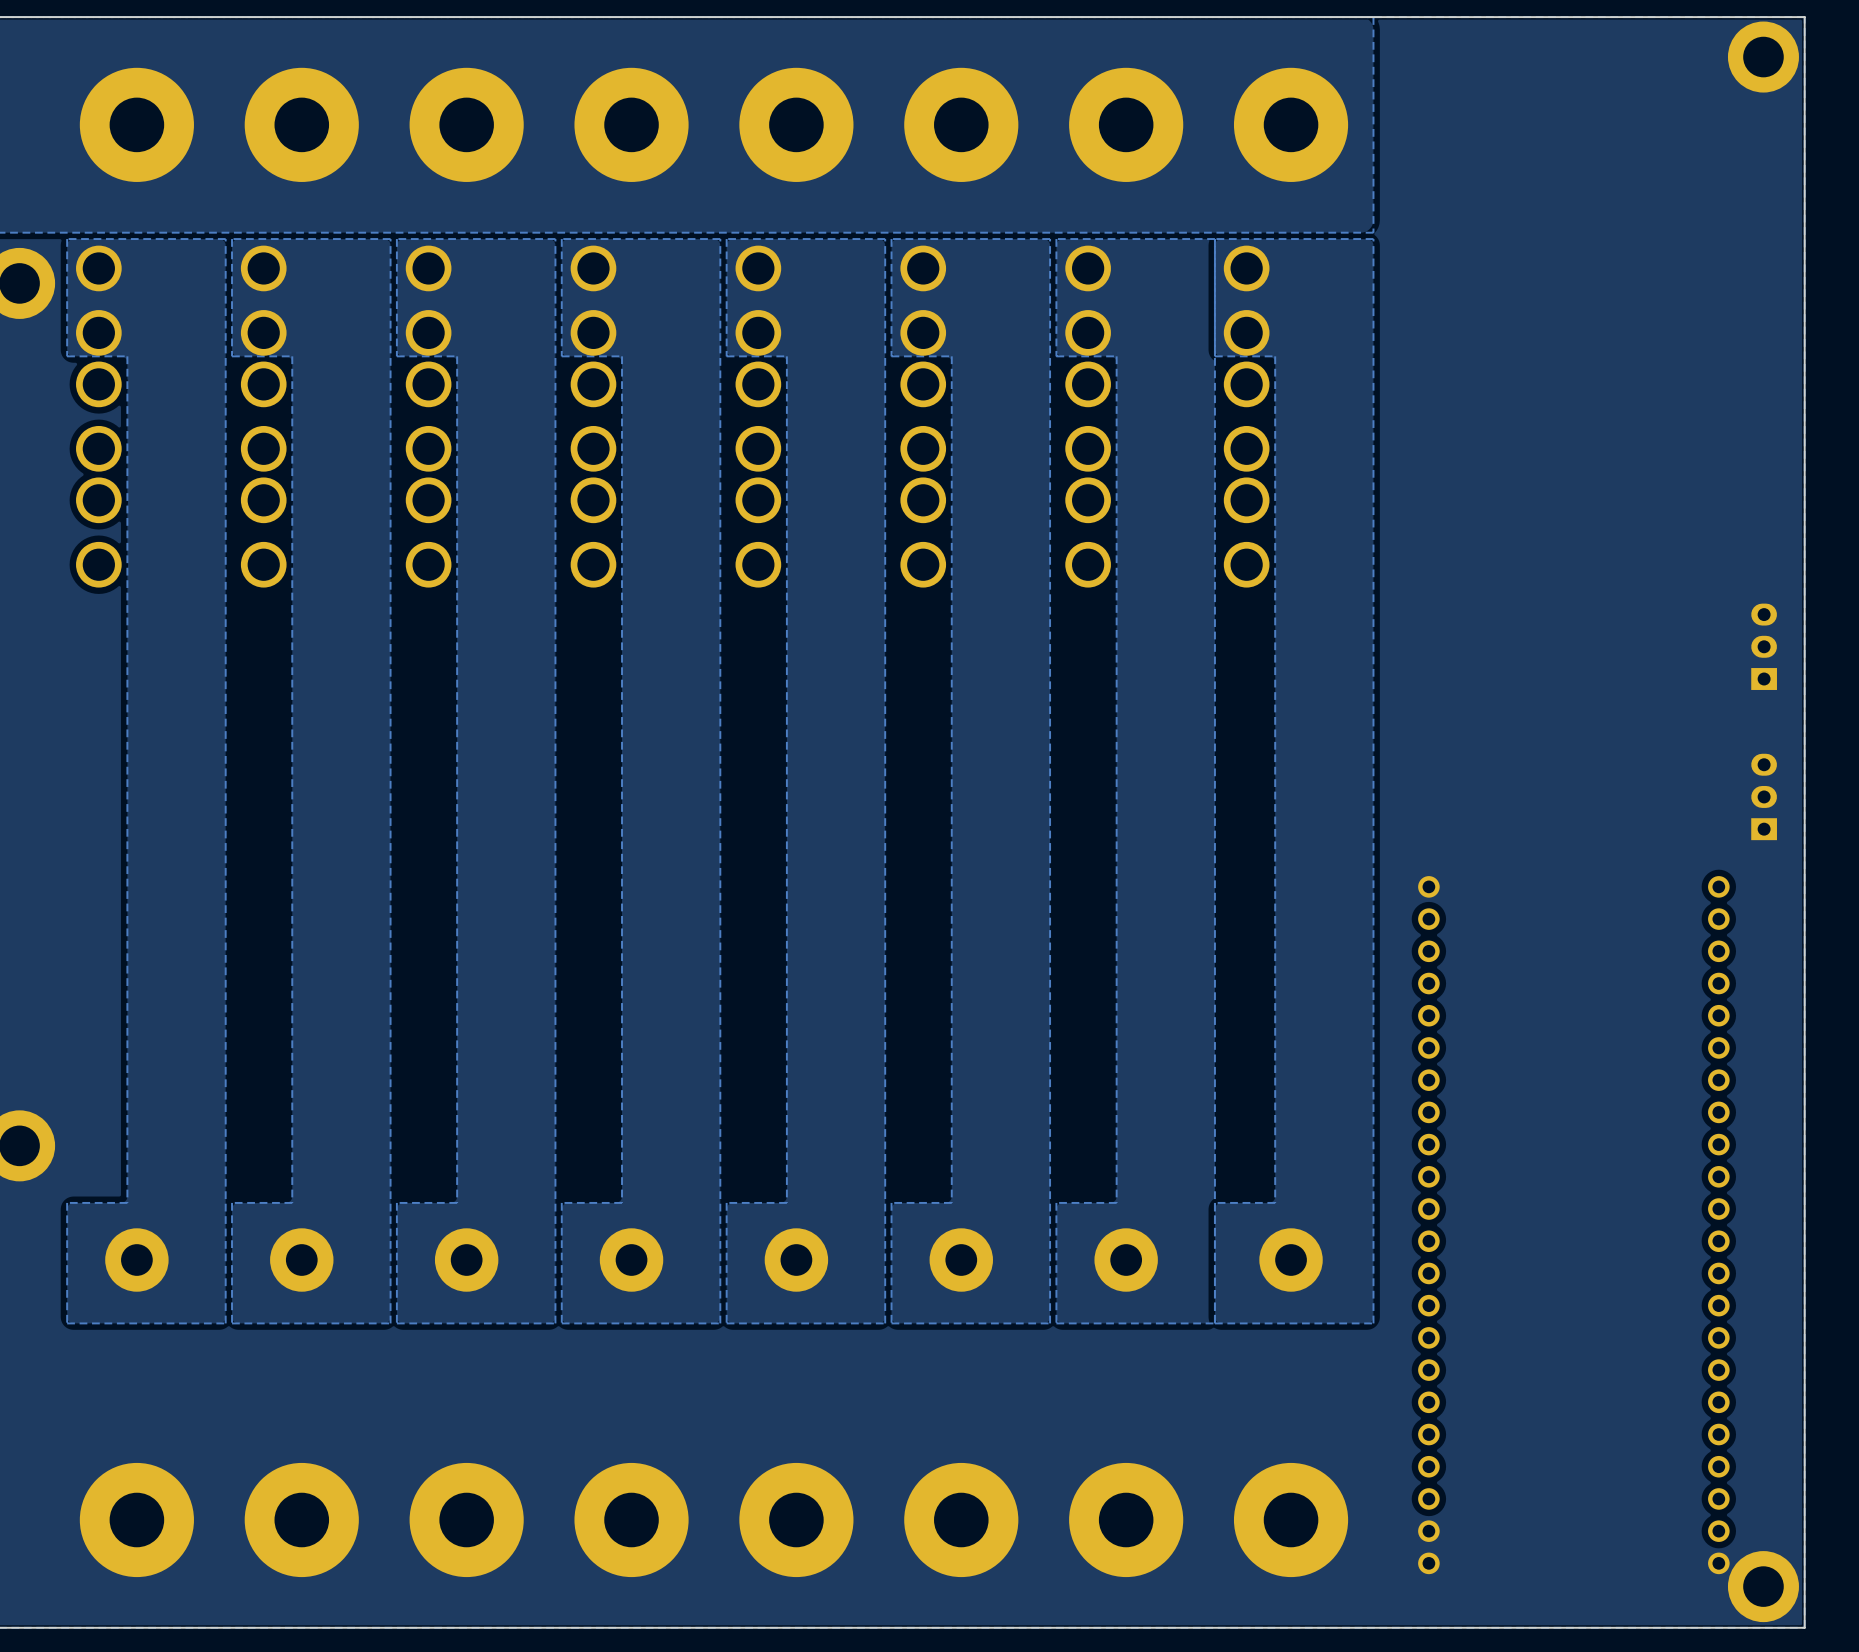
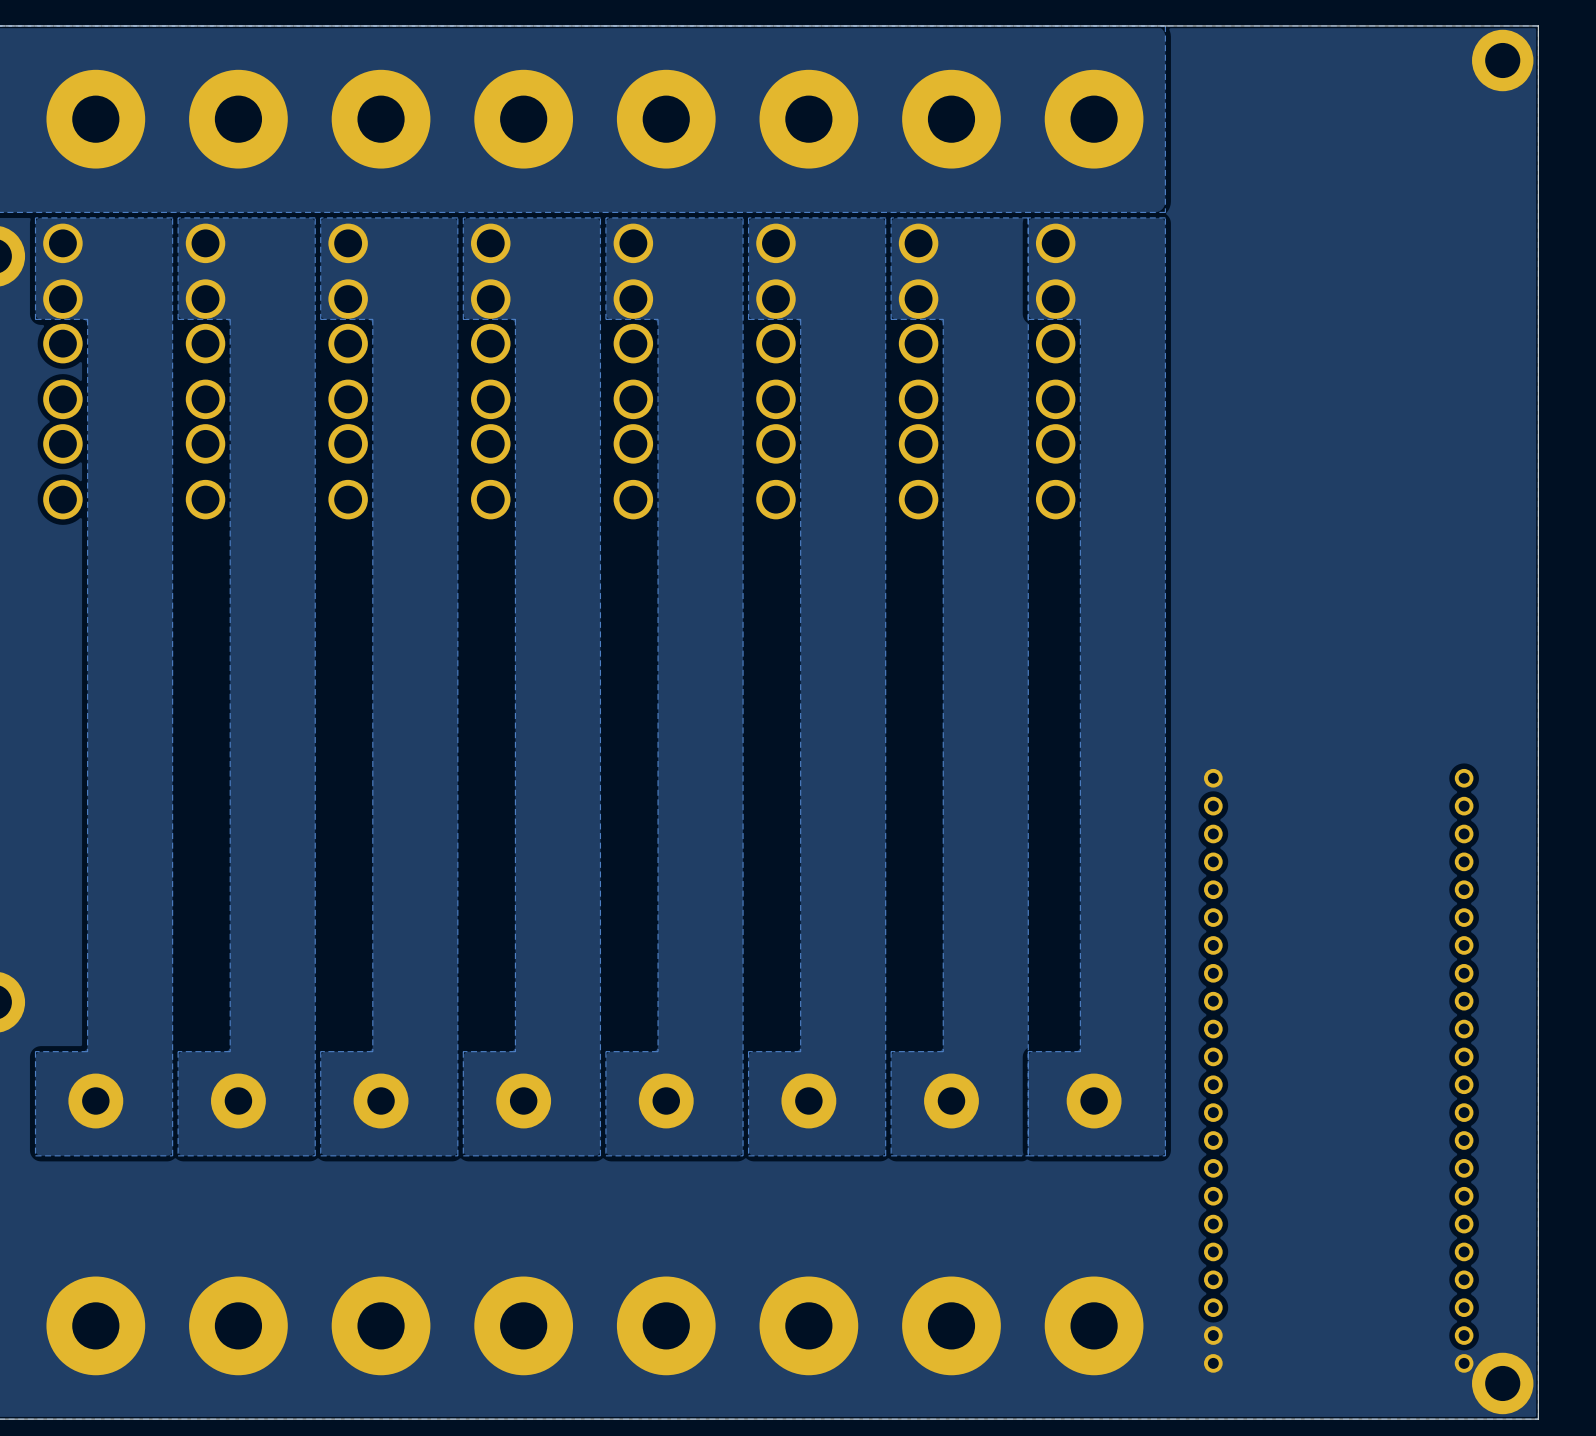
part: (1764, 646) -> none
part: (1764, 796) -> none

